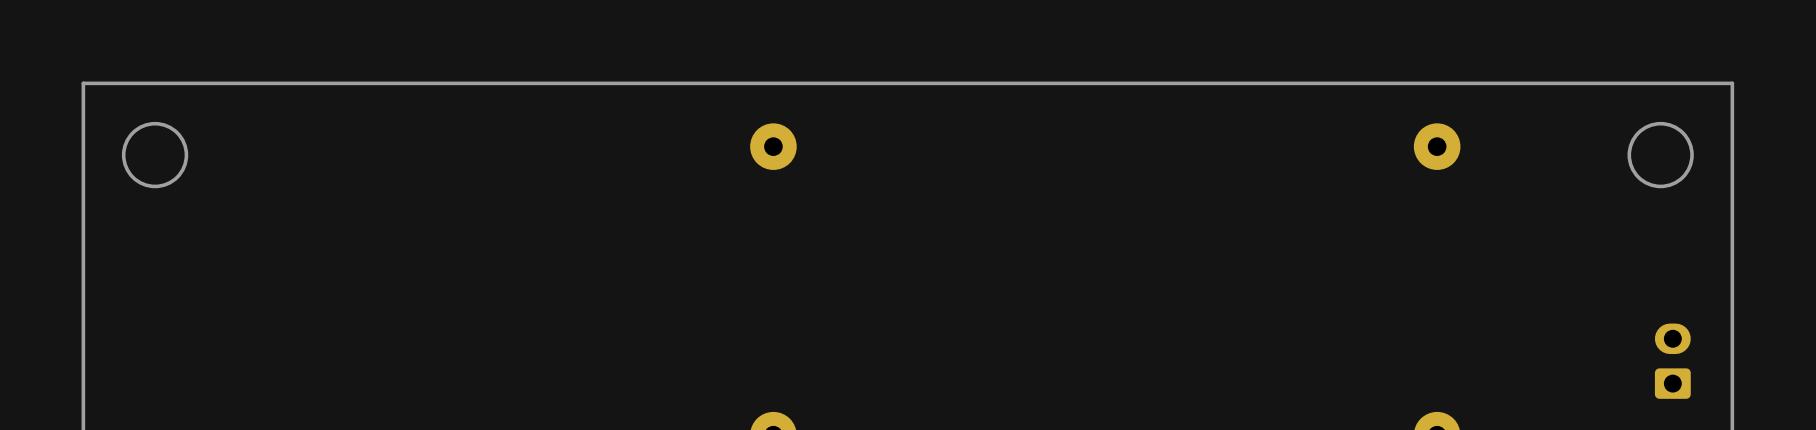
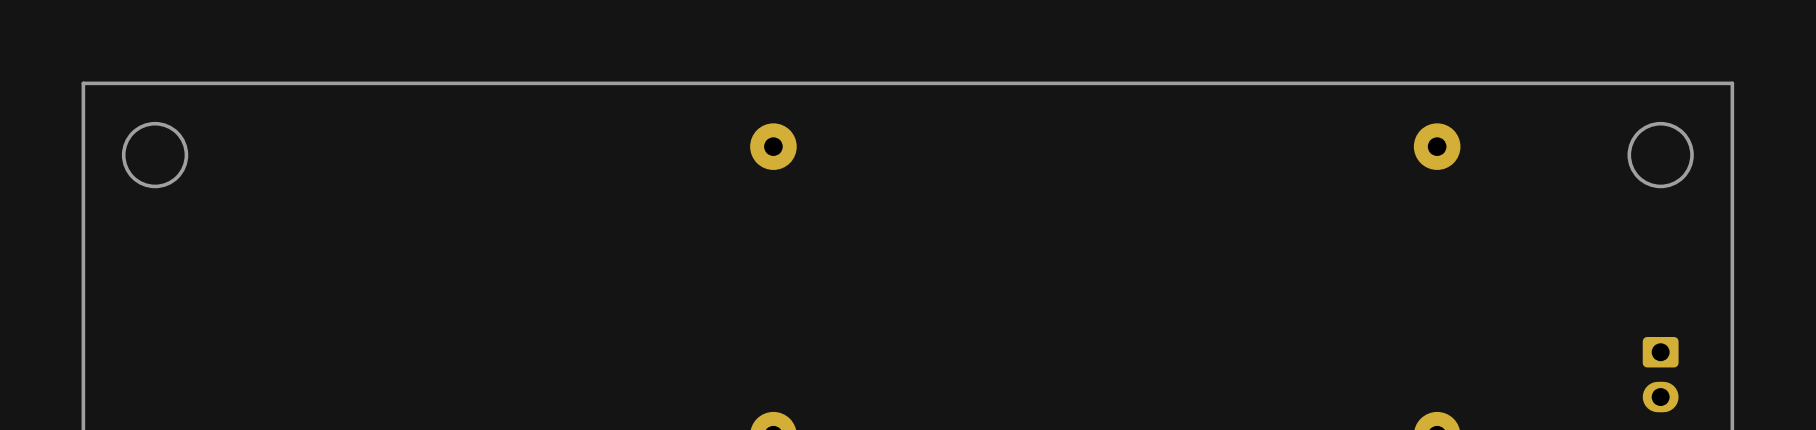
part rotation: 0° (1672, 361) -> 180° (1660, 374)

